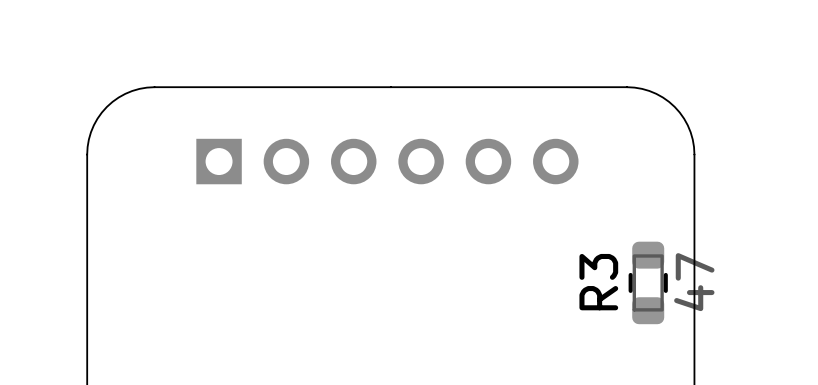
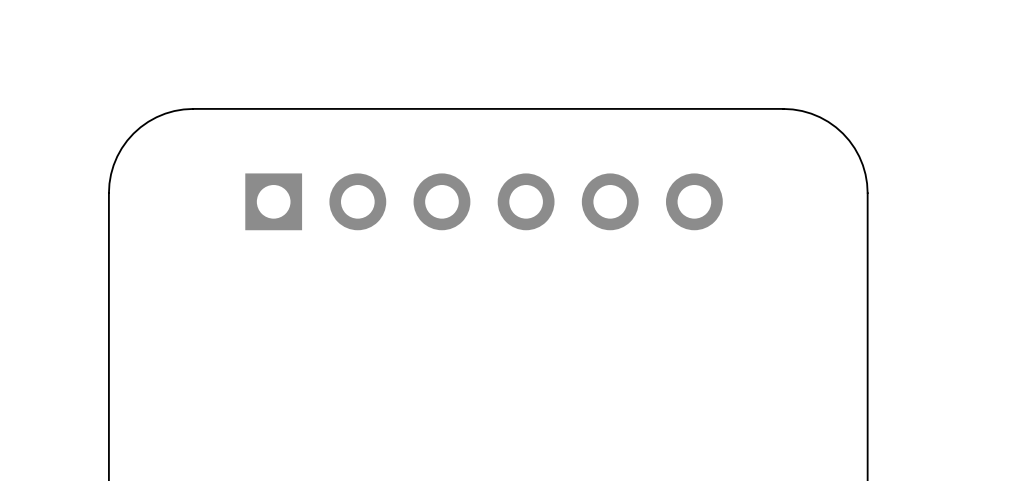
R3: 47 (648, 282) -> none

